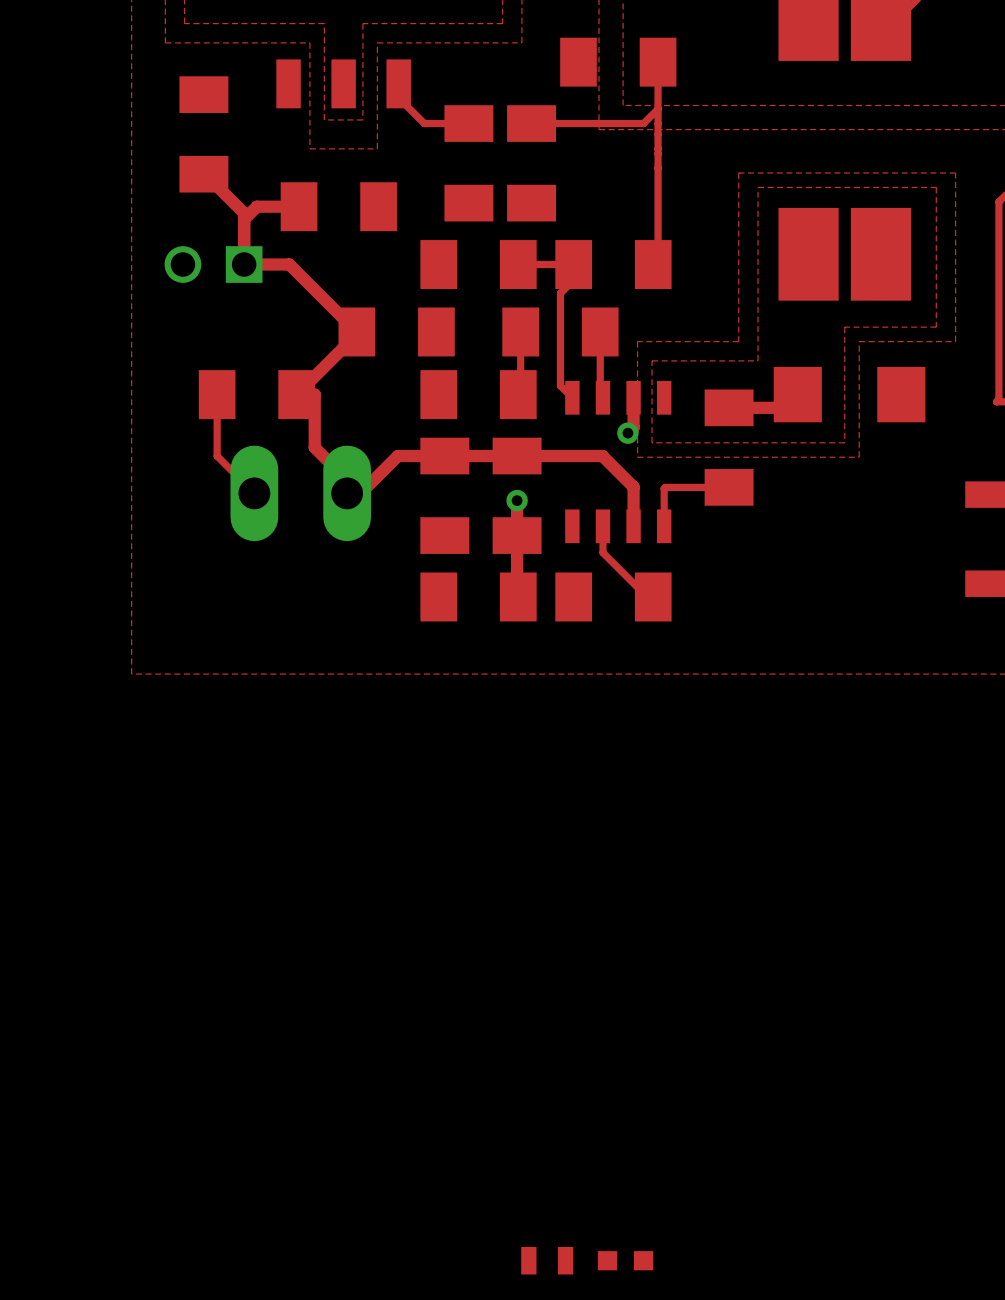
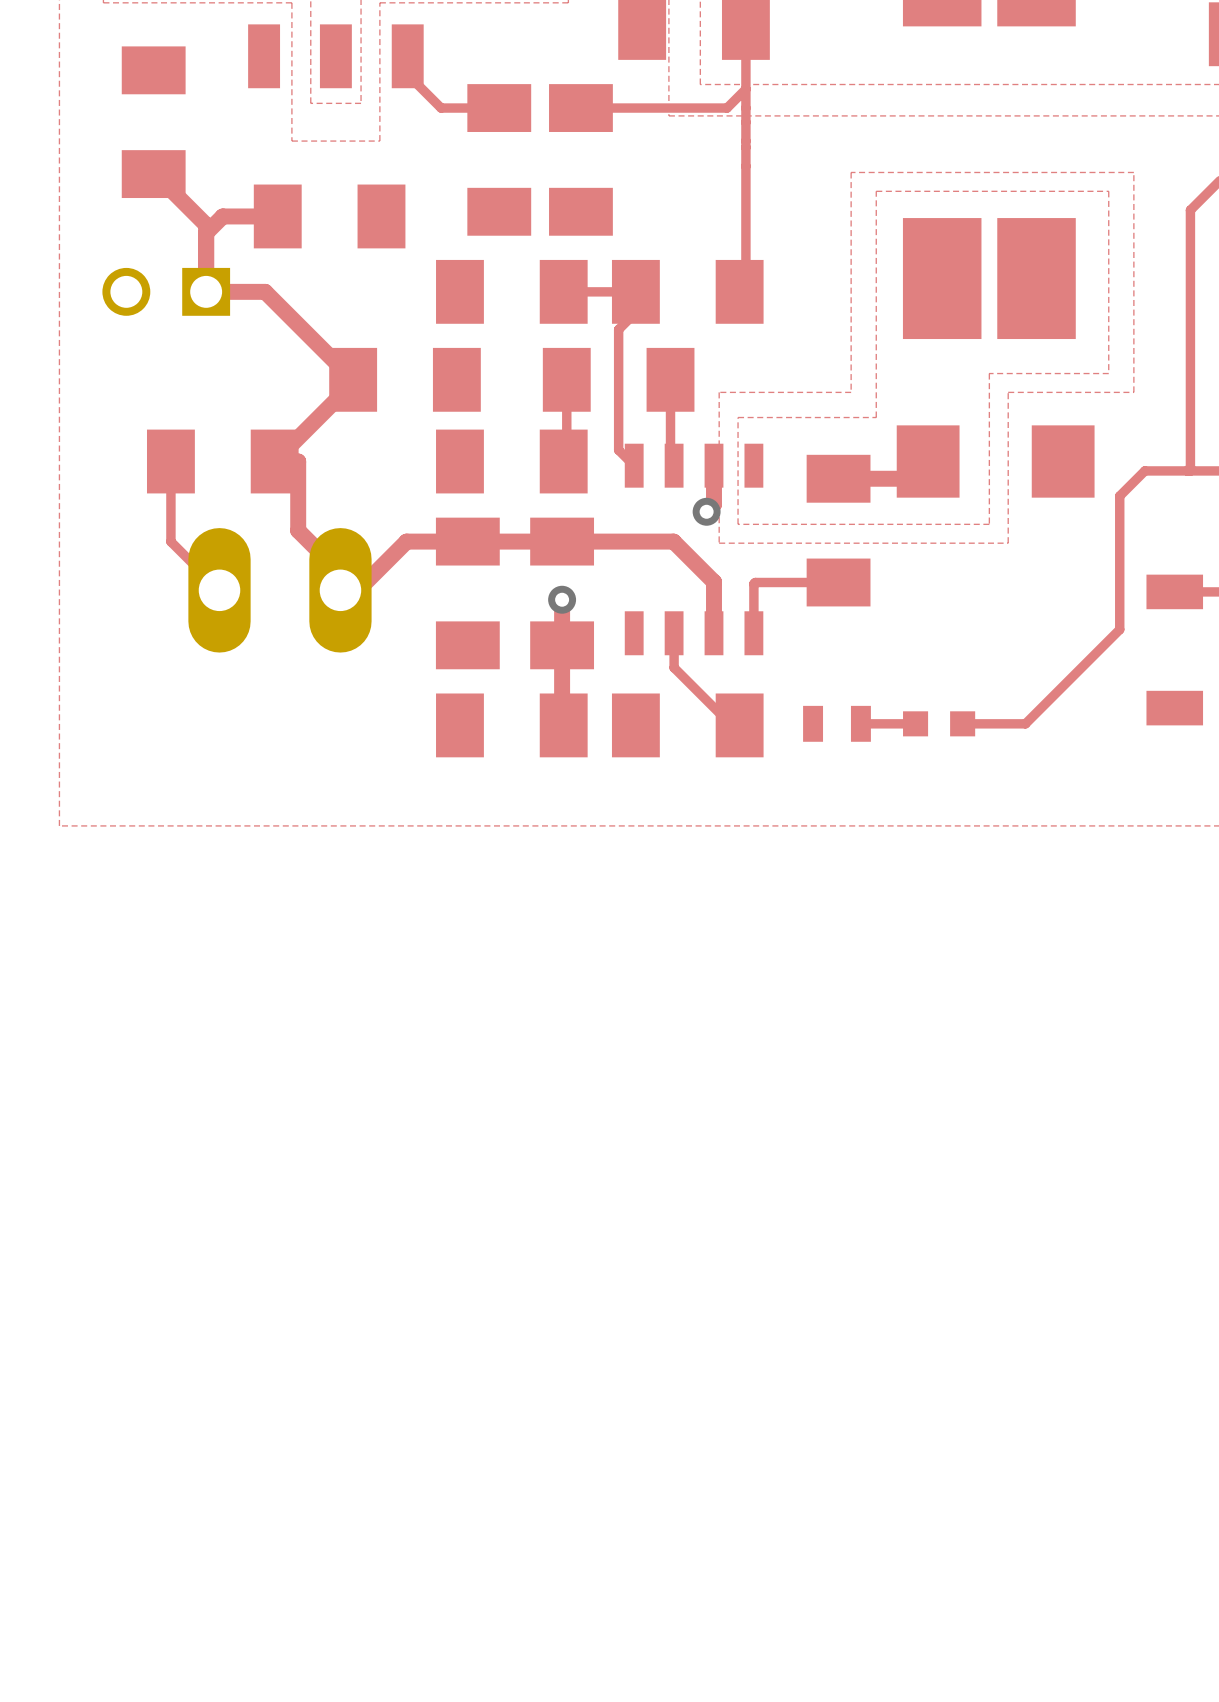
track: none -> (1187, 470) (1144, 470) (1119, 496) (1119, 629) (1025, 723) (962, 723)
part: none -> (836, 723)
track: none -> (860, 723) (915, 723)
part: none -> (939, 723)
part: (547, 1260) -> none
part: (625, 1260) -> none

